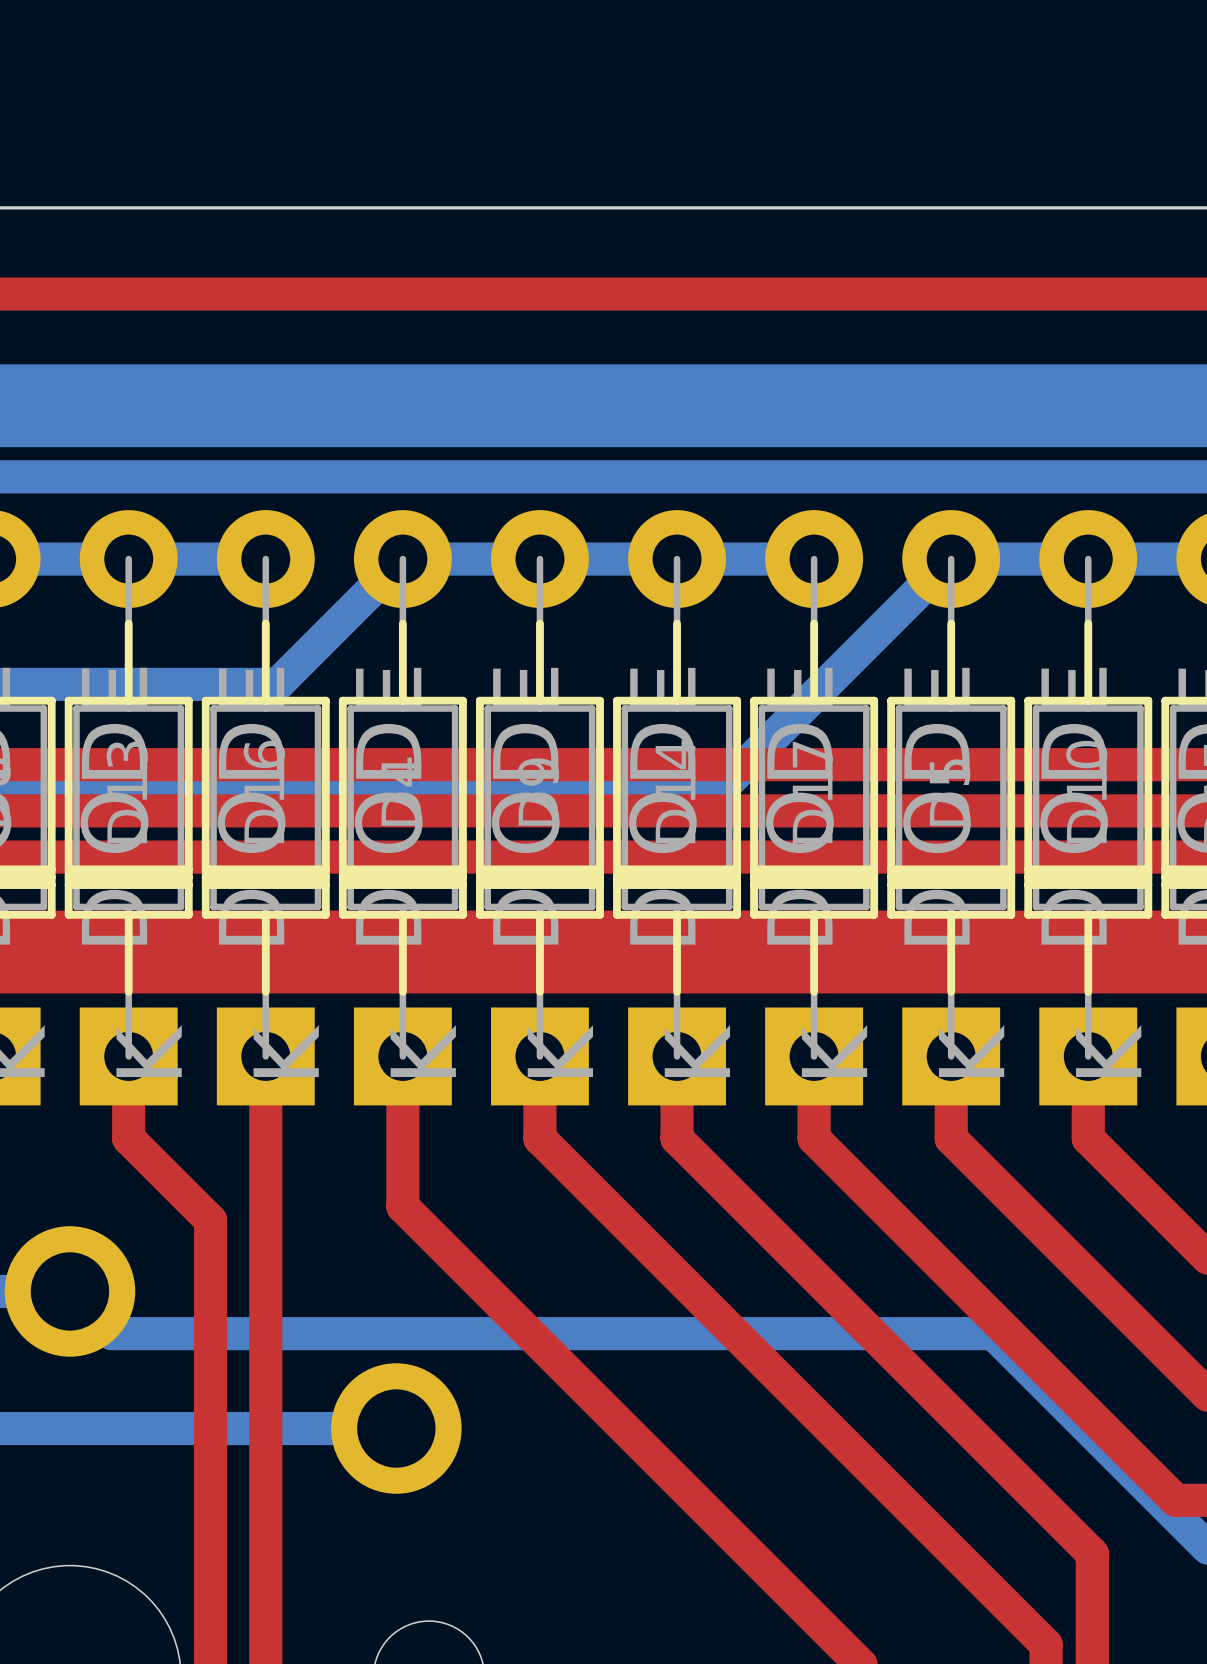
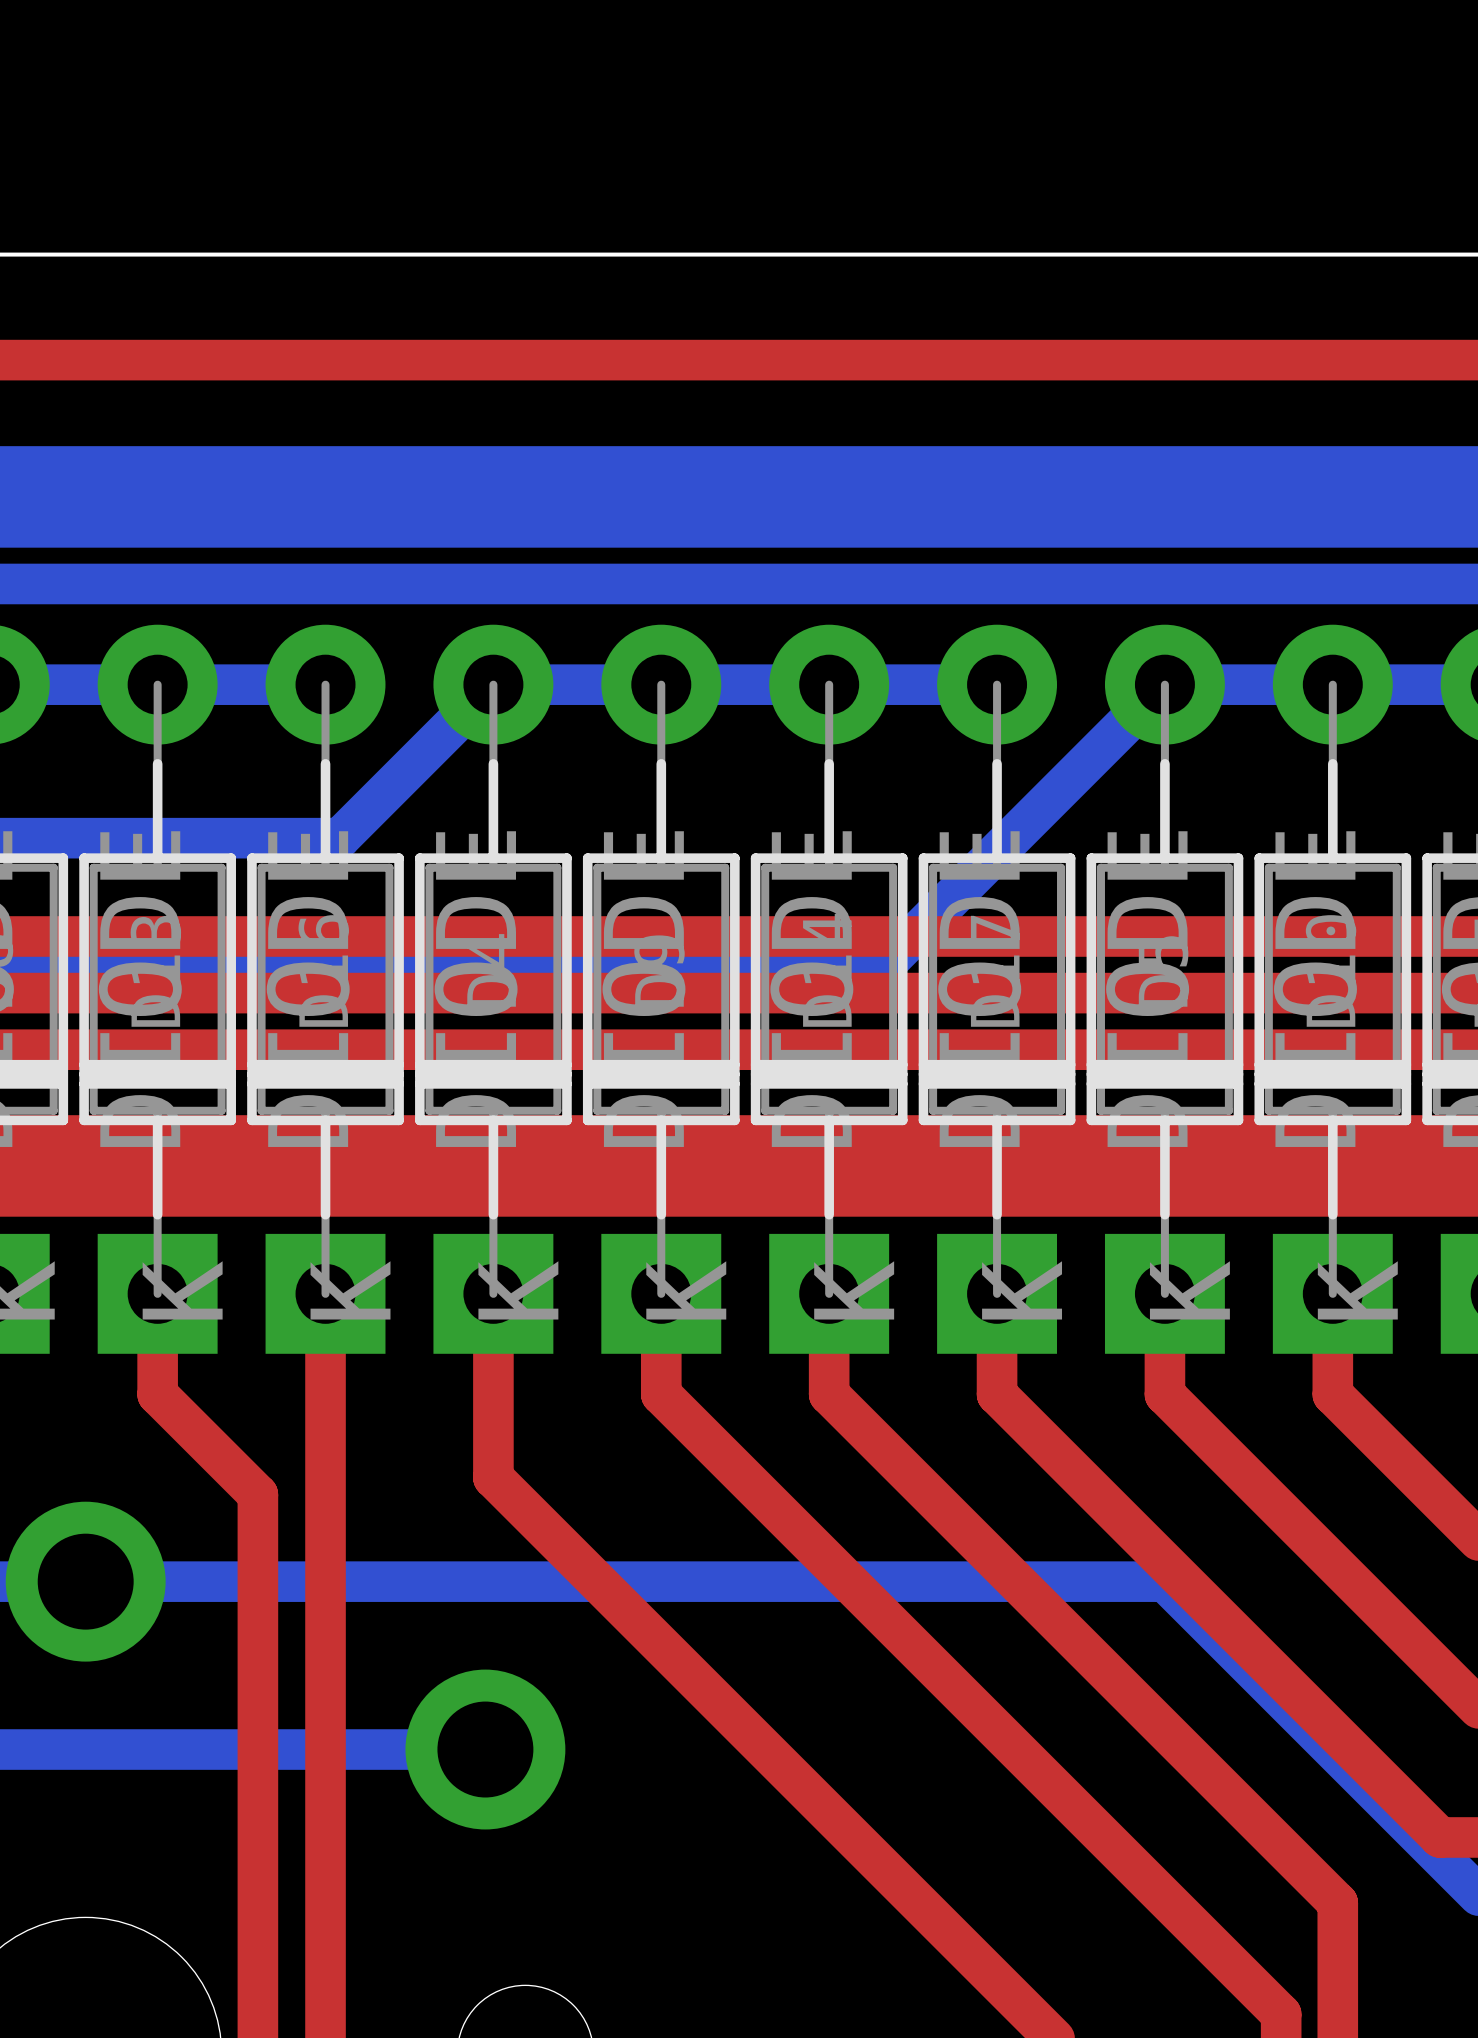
bottom track: (69, 1291) (112, 1333) (993, 1333) -> (85, 1581) (1164, 1581) (1216, 1633)

